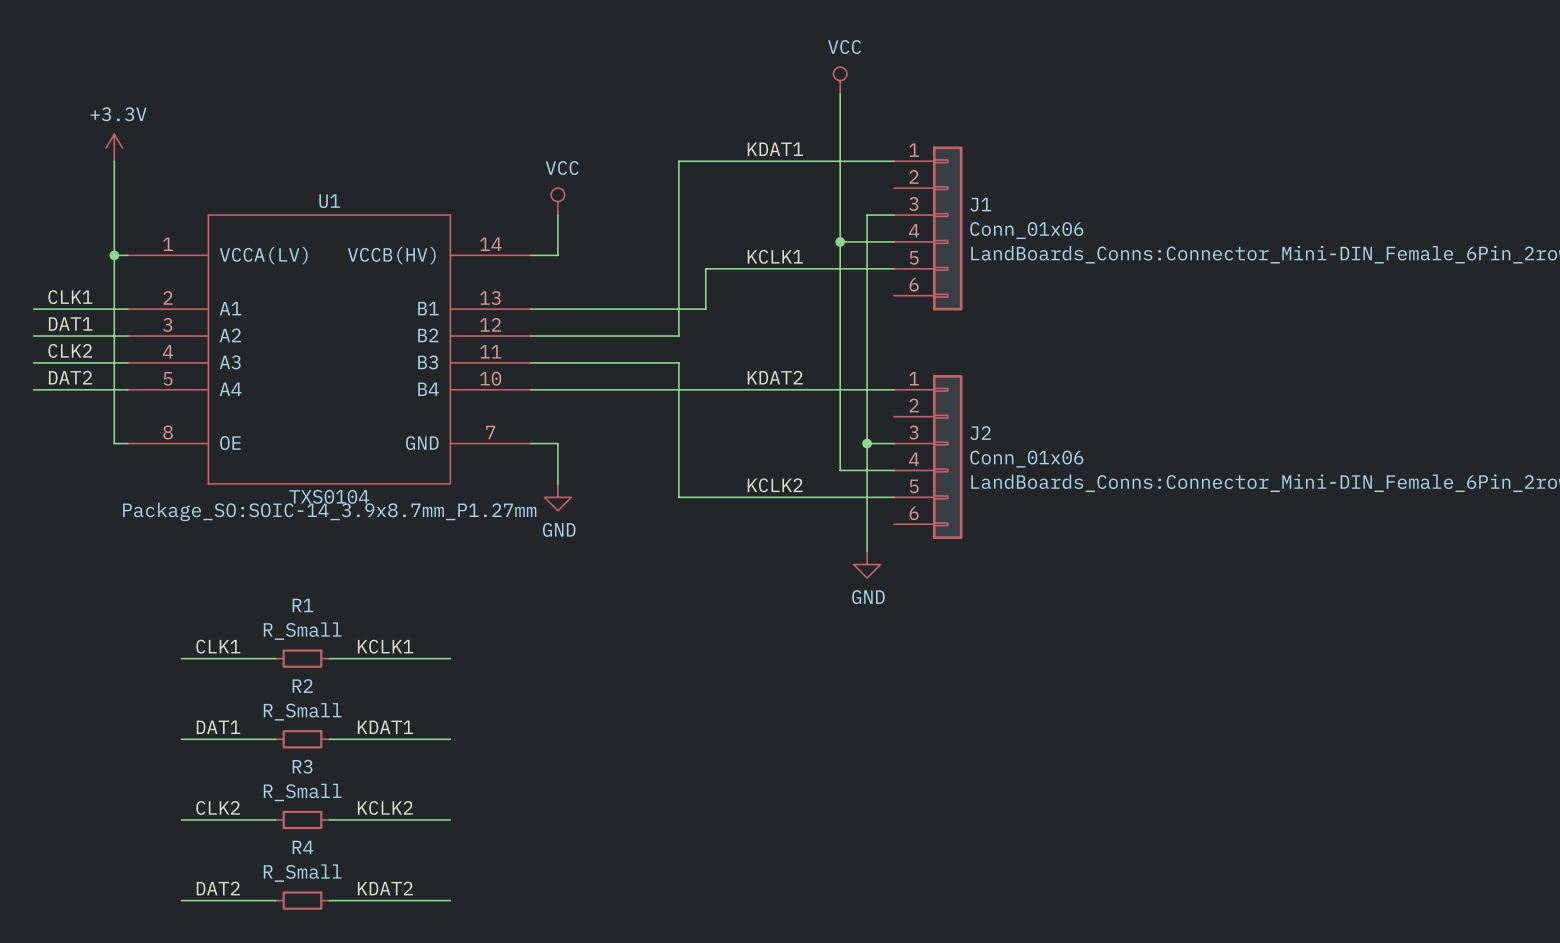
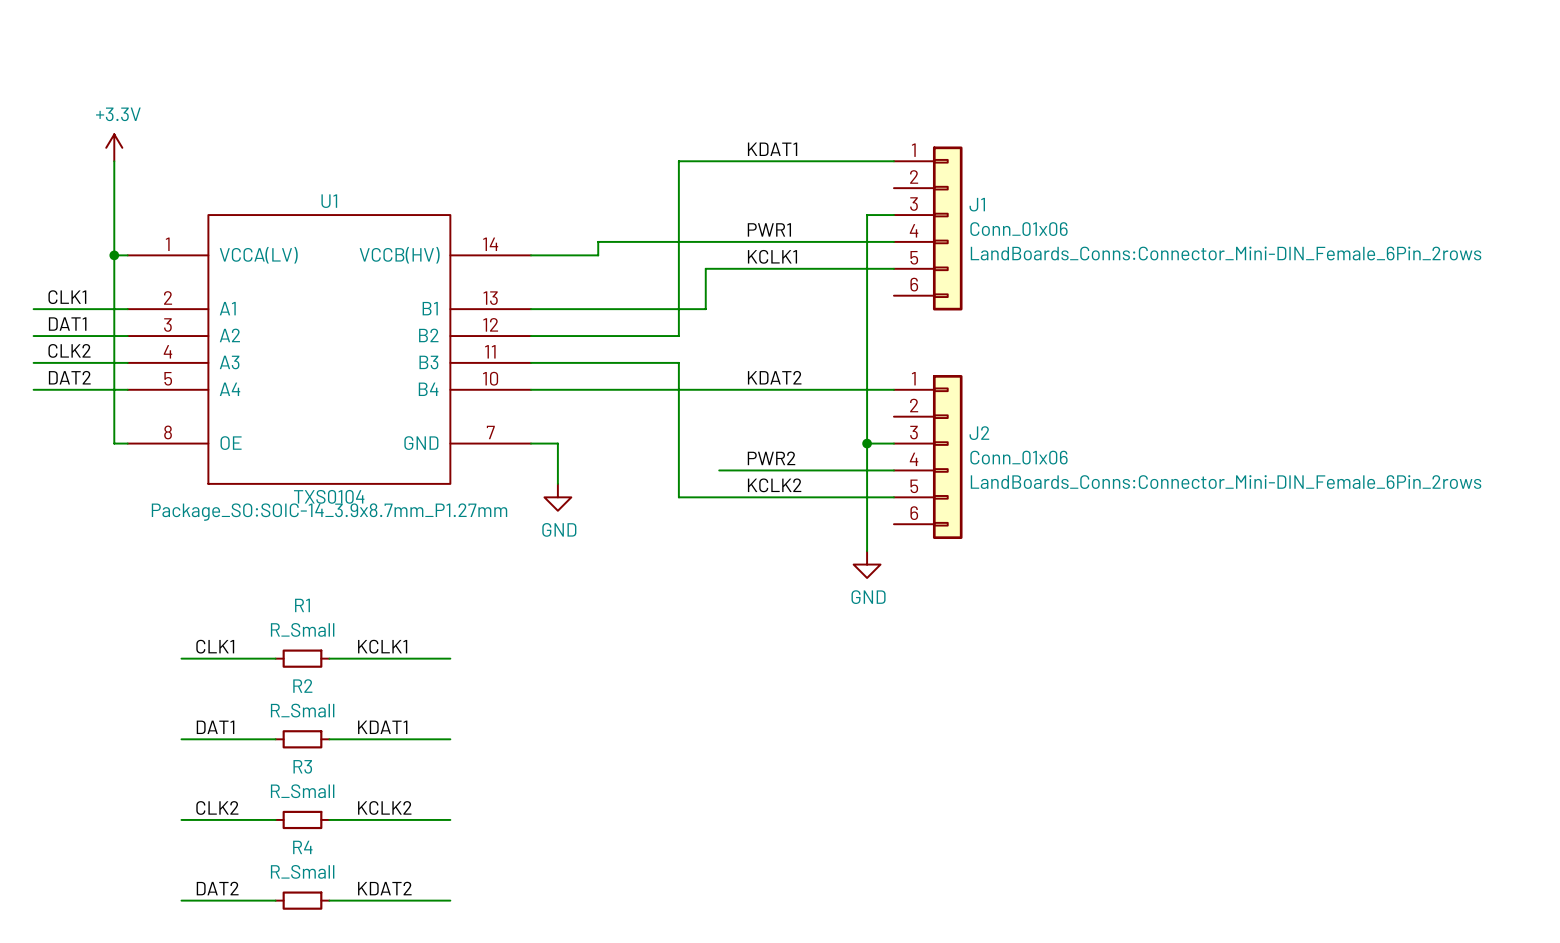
power symbol: VCC (840, 80) -> none
wire: (840, 94) (840, 470) -> (719, 470) (840, 470)
power symbol: VCC (557, 201) -> none
wire: (557, 215) (557, 255) -> (840, 241) (598, 241) (598, 255) (557, 255)
label: none -> PWR1 (769, 229)
junction: (840, 241) -> none
label: none -> PWR2 (771, 458)

